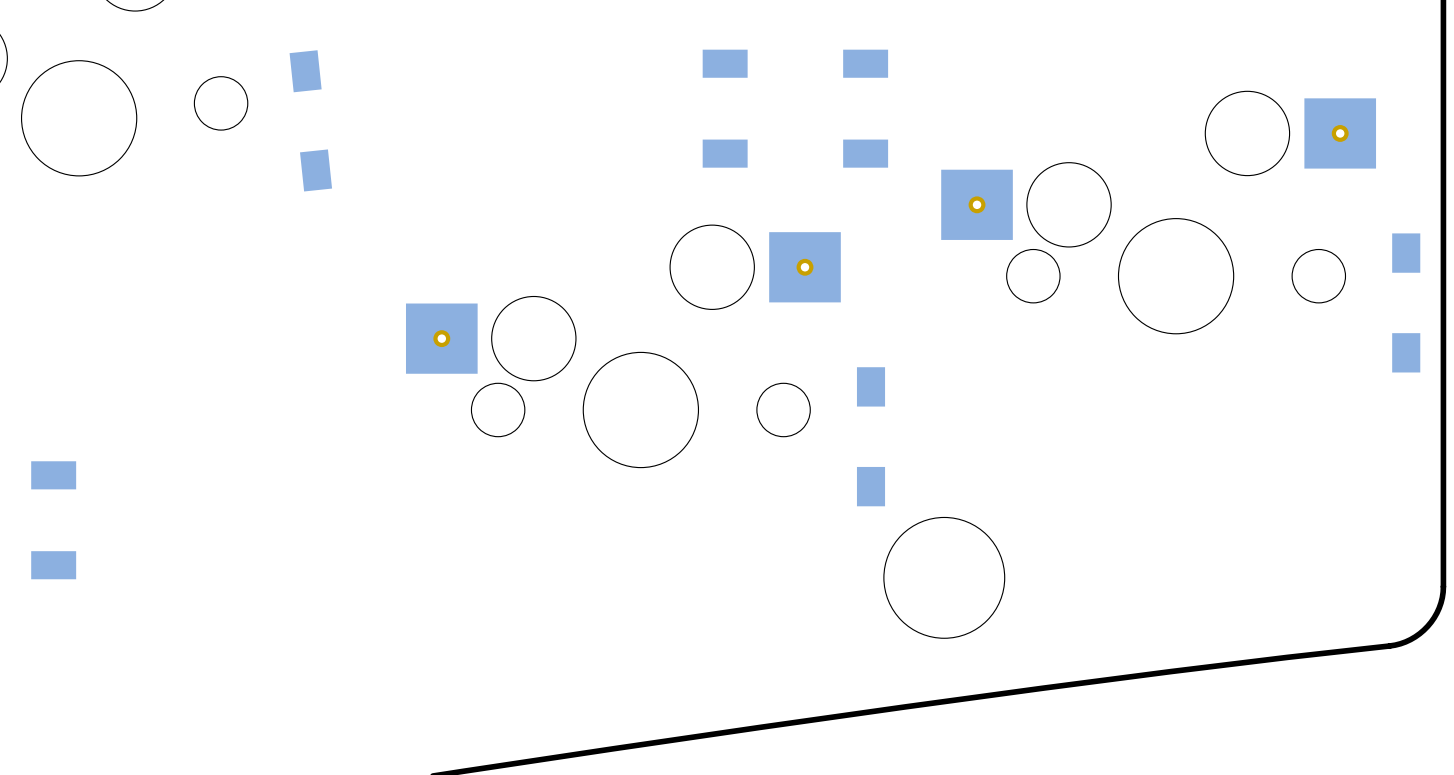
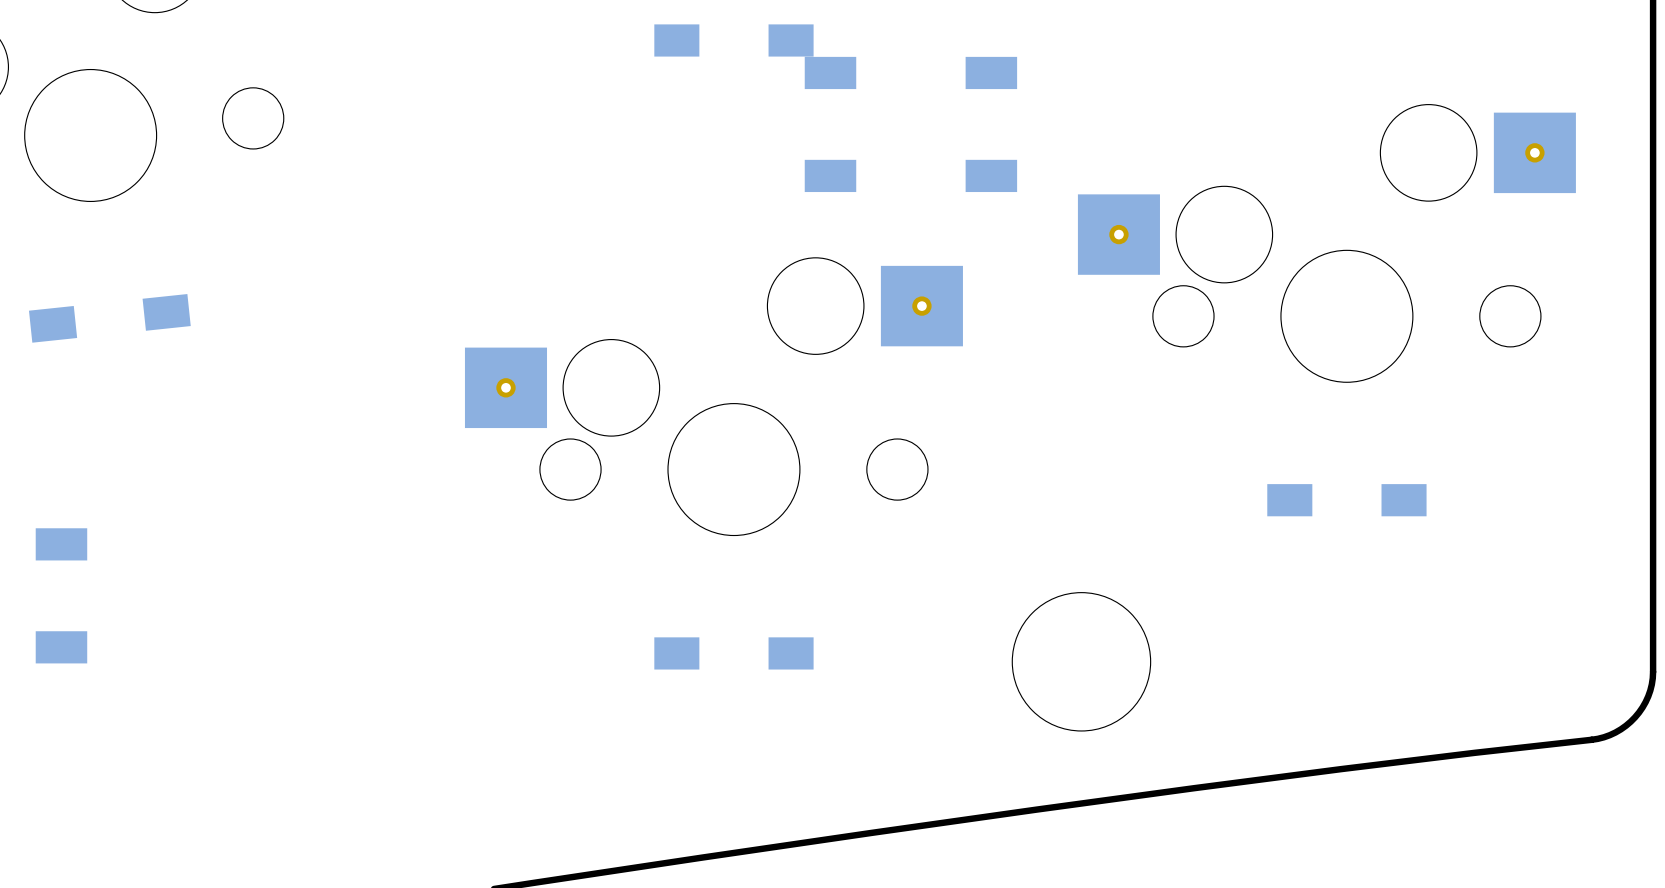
part: none -> (733, 40)
part rotation: 0° (310, 120) -> 90° clockwise (109, 318)
part position: (310, 120) -> (109, 318)
part: (1406, 302) -> none
part: (871, 436) -> none
part: none -> (1346, 500)
part: none -> (733, 653)

